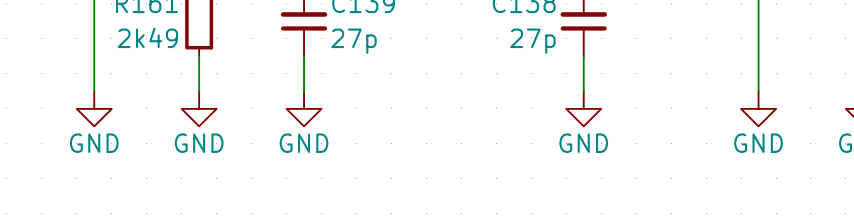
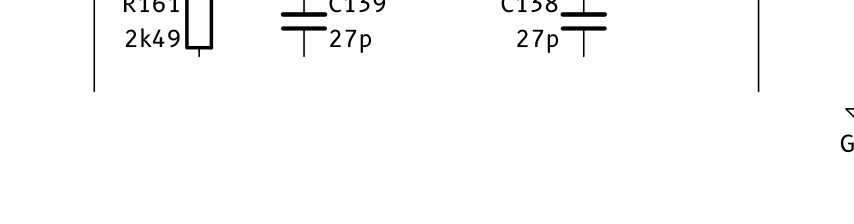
wire: (199, 56) (199, 91) -> none
wire: (304, 56) (304, 91) -> none
wire: (583, 56) (583, 91) -> none
power symbol: GND (94, 108) -> none
power symbol: GND (199, 108) -> none
power symbol: GND (304, 108) -> none
power symbol: GND (583, 108) -> none
power symbol: GND (758, 108) -> none

